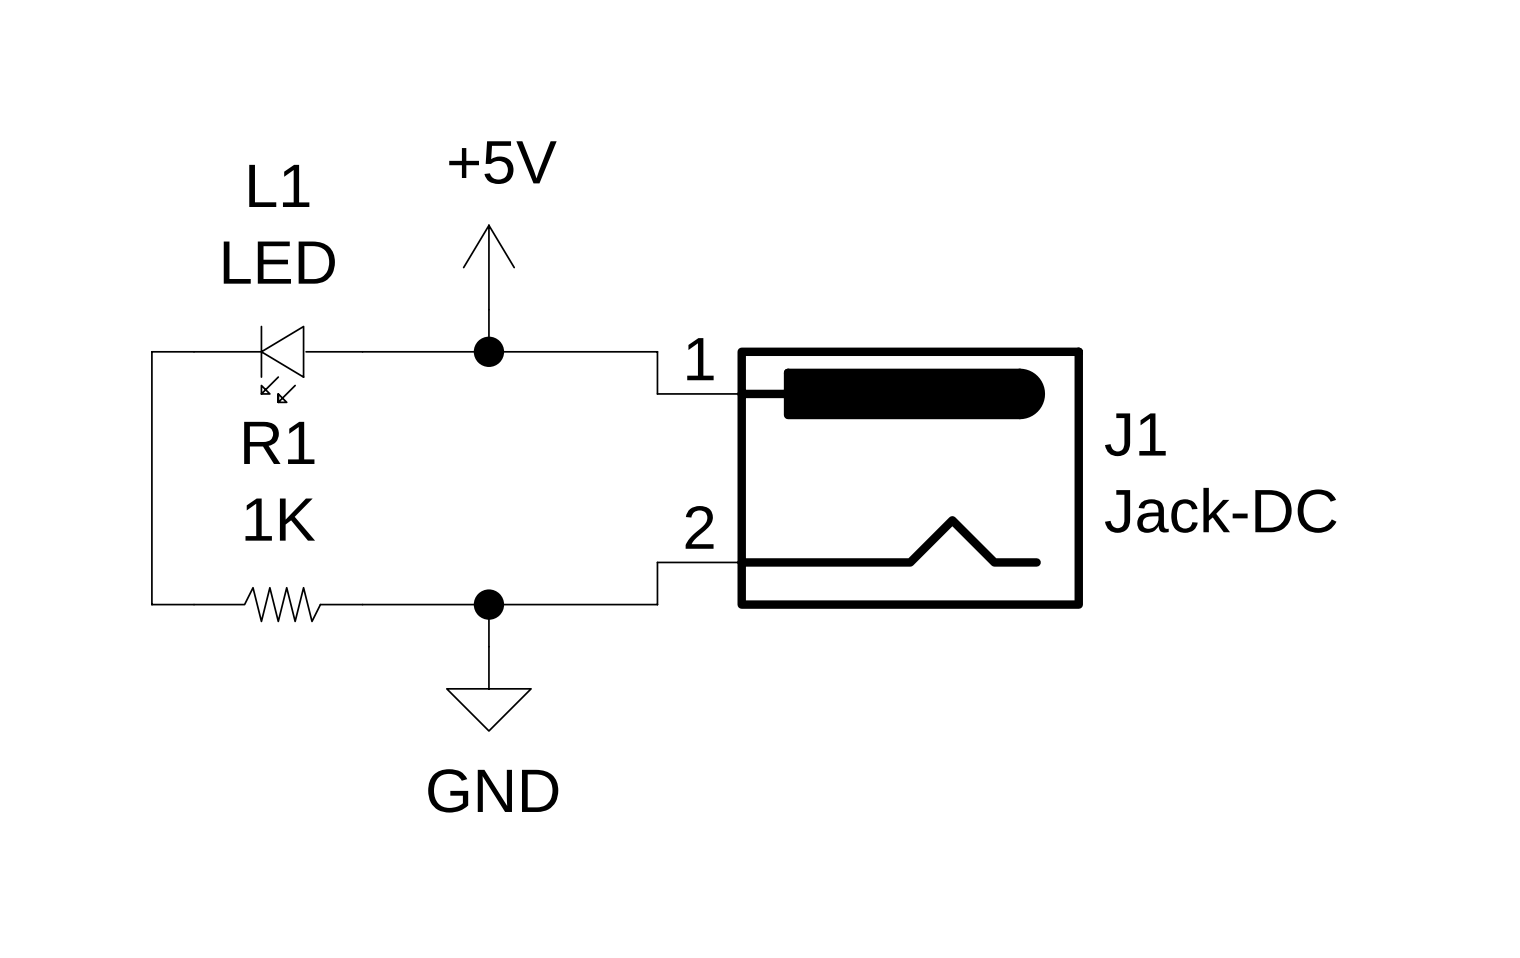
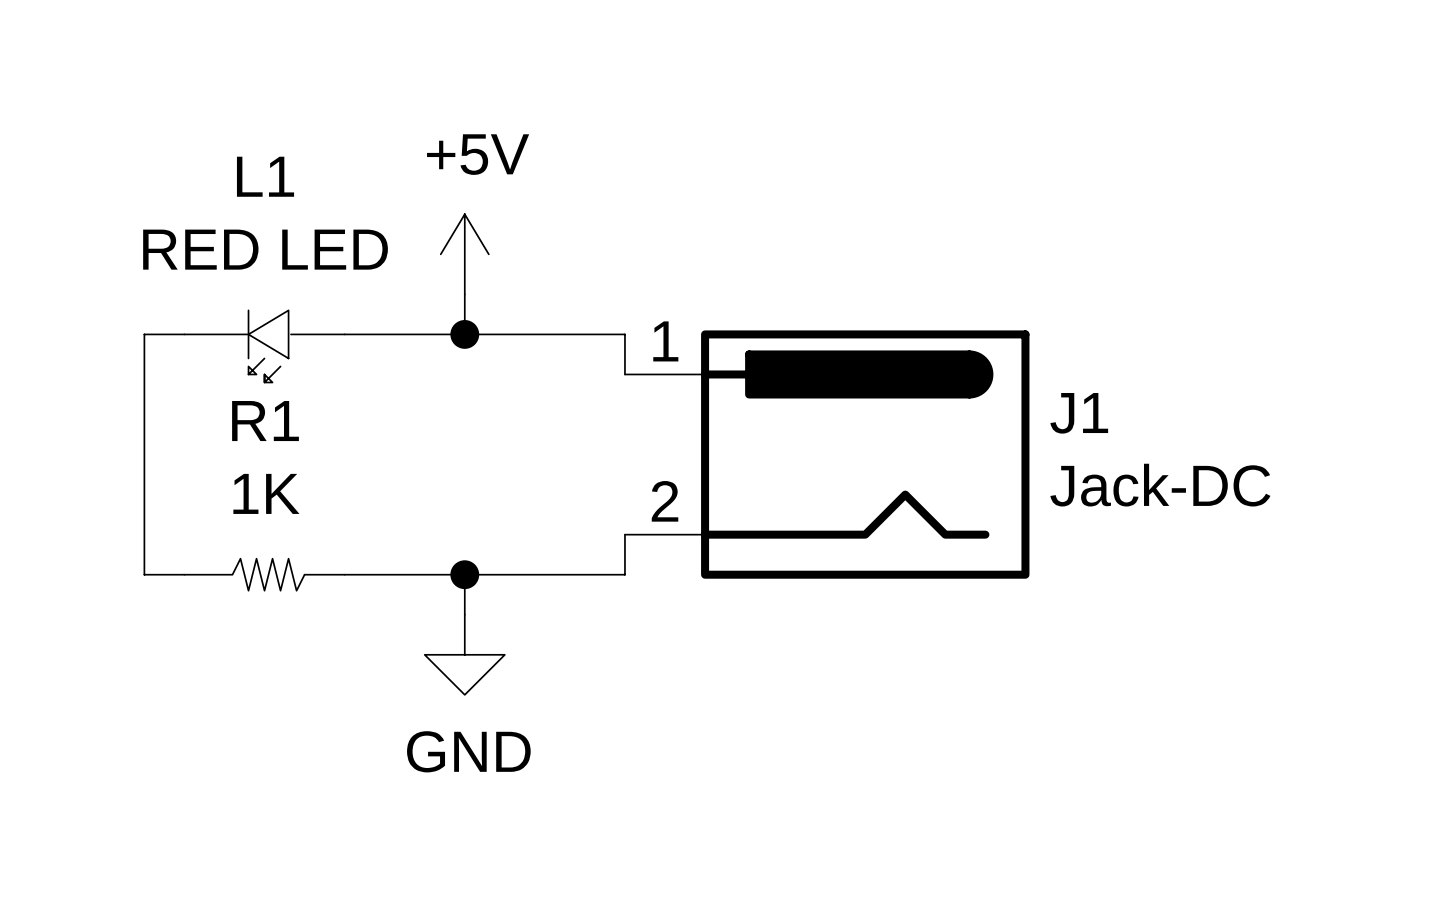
L1 value: LED (279, 262) -> RED LED (265, 249)

